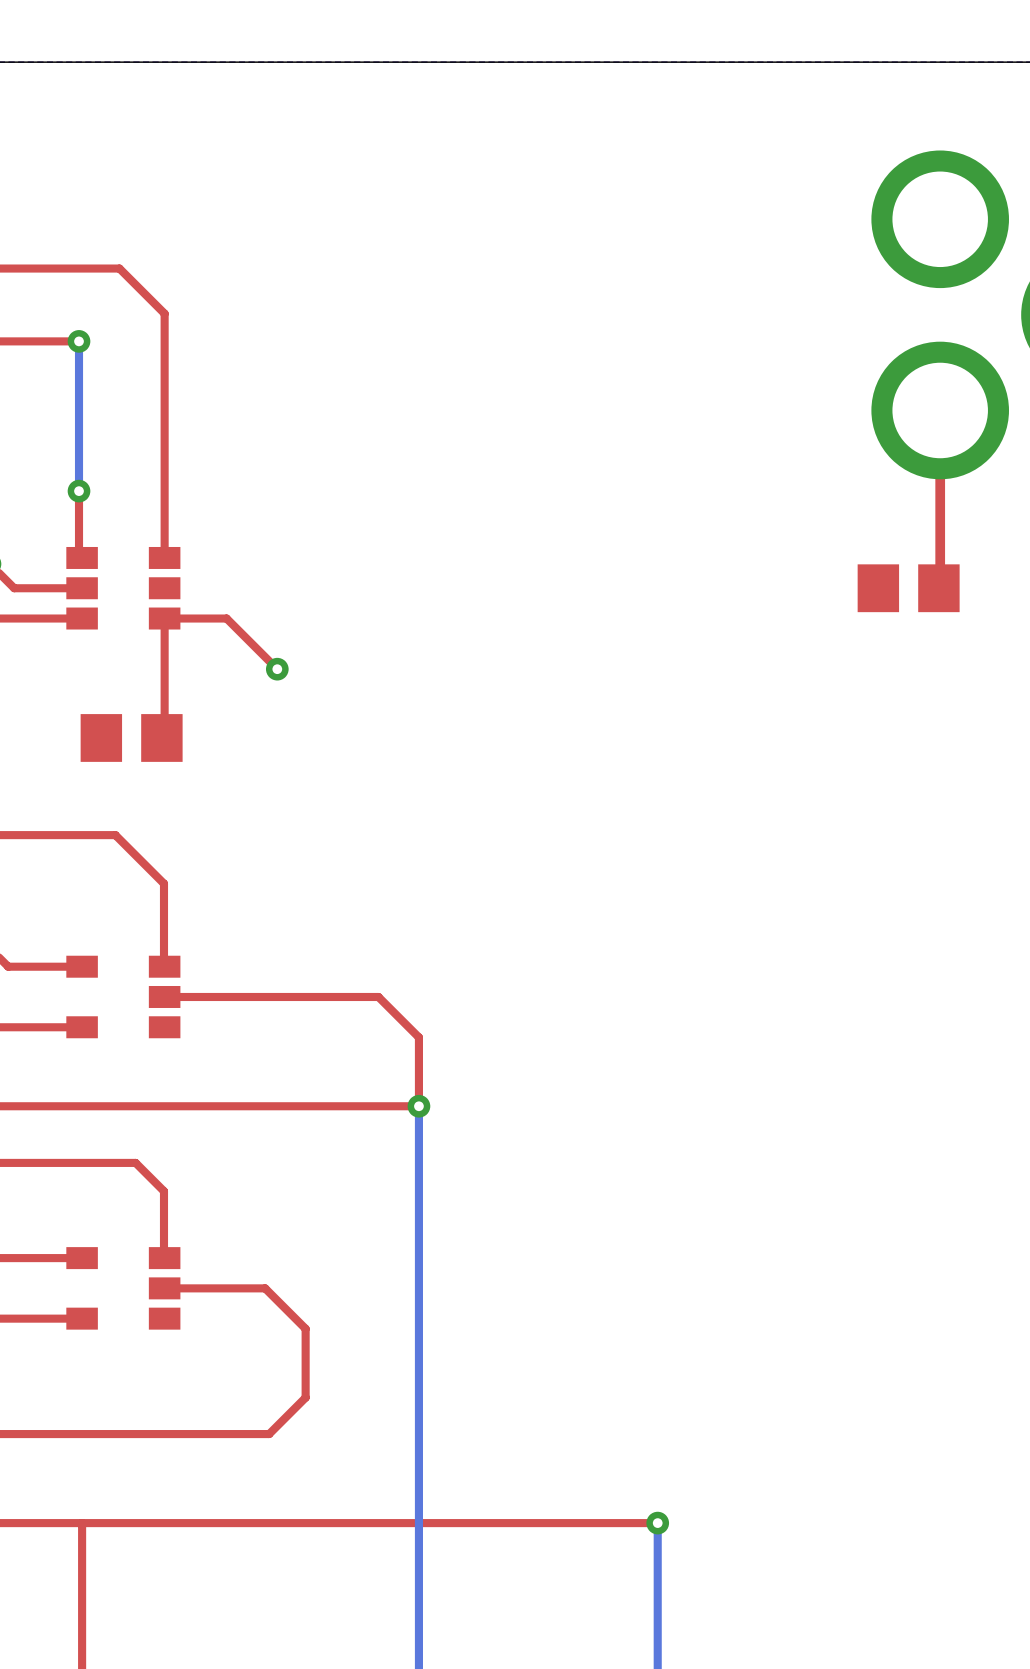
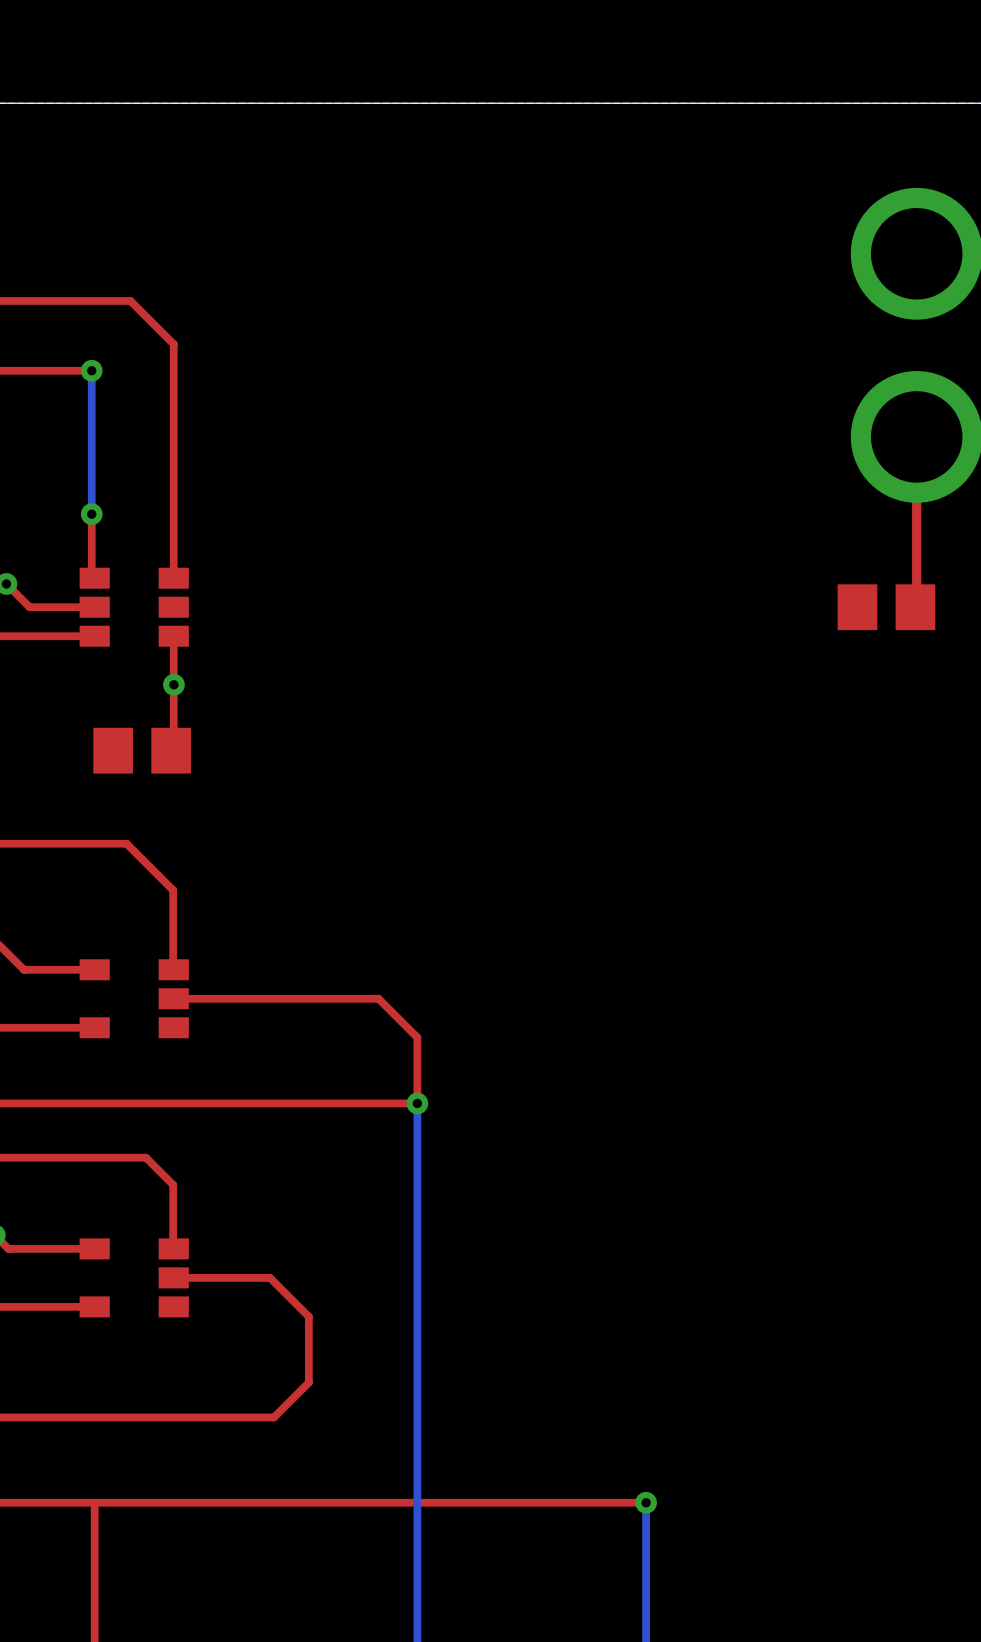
top track: (164, 618) (226, 618) (277, 669) -> none
via position: (277, 669) -> (173, 684)

